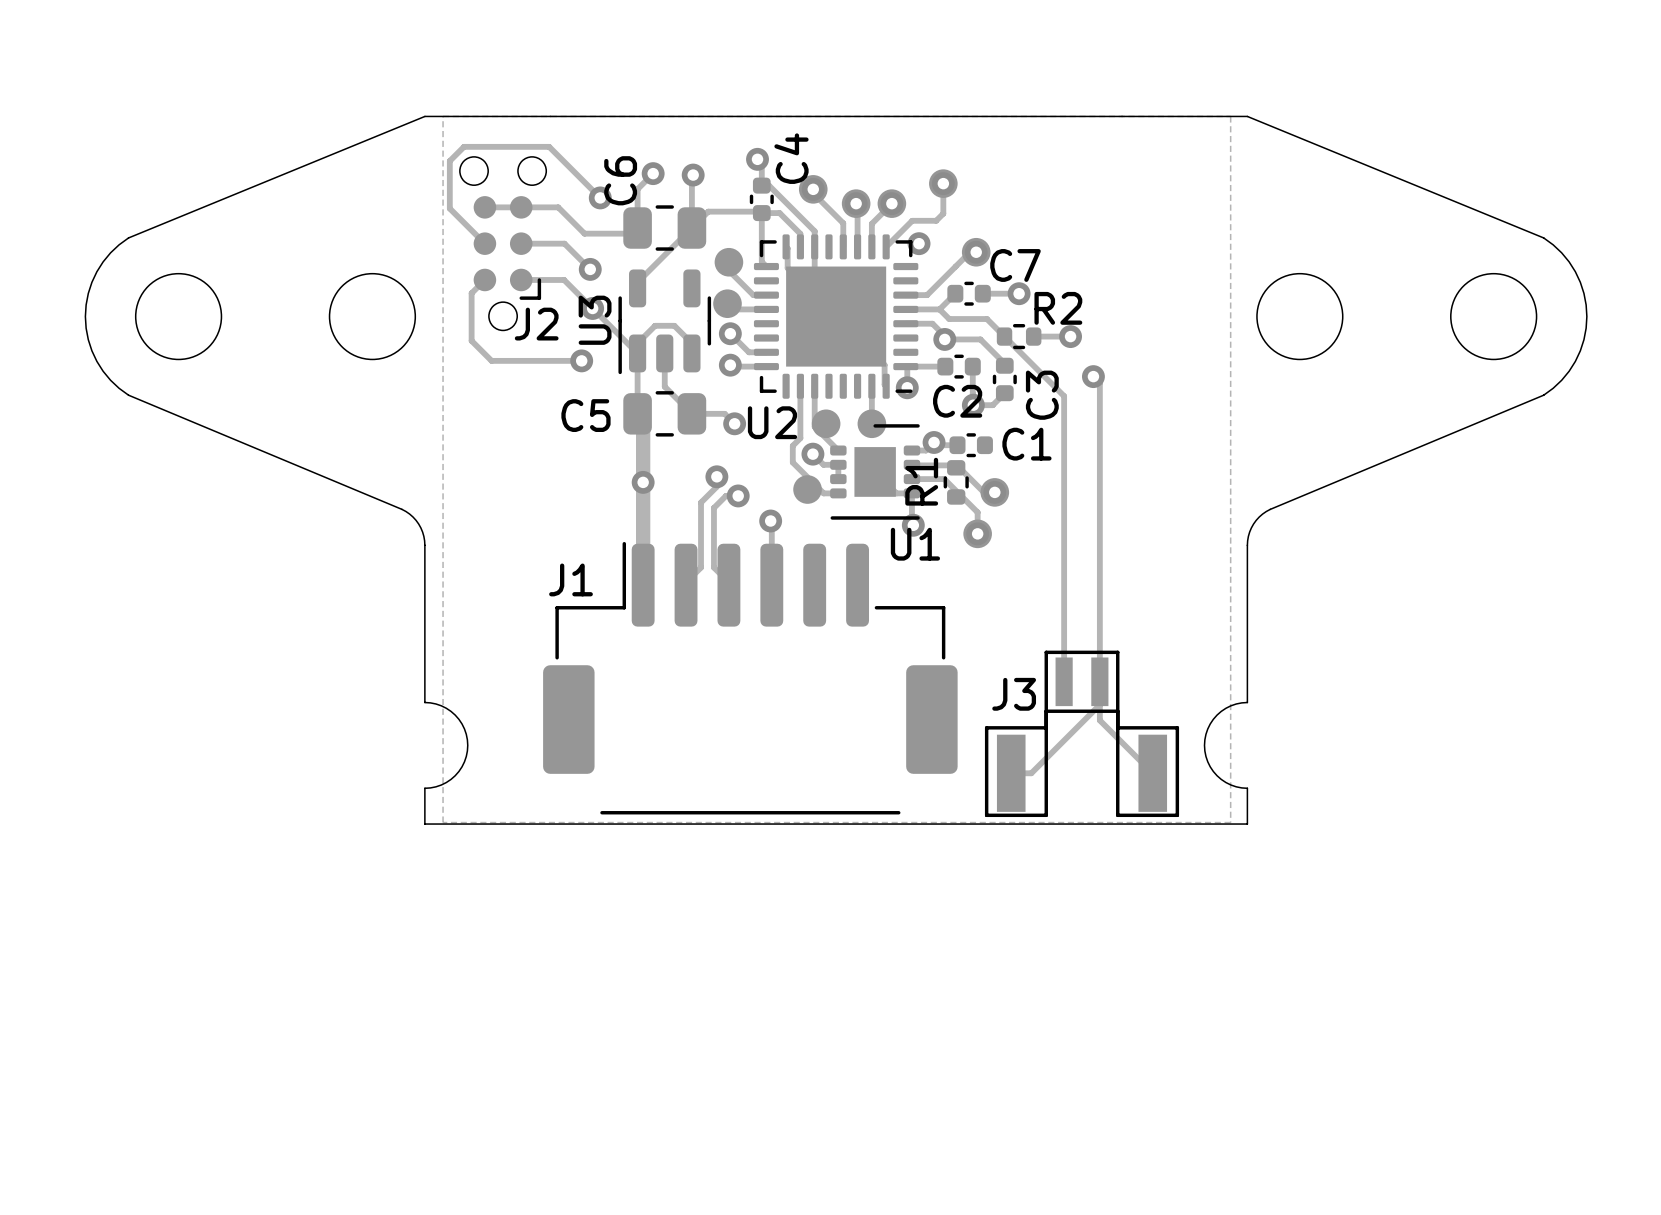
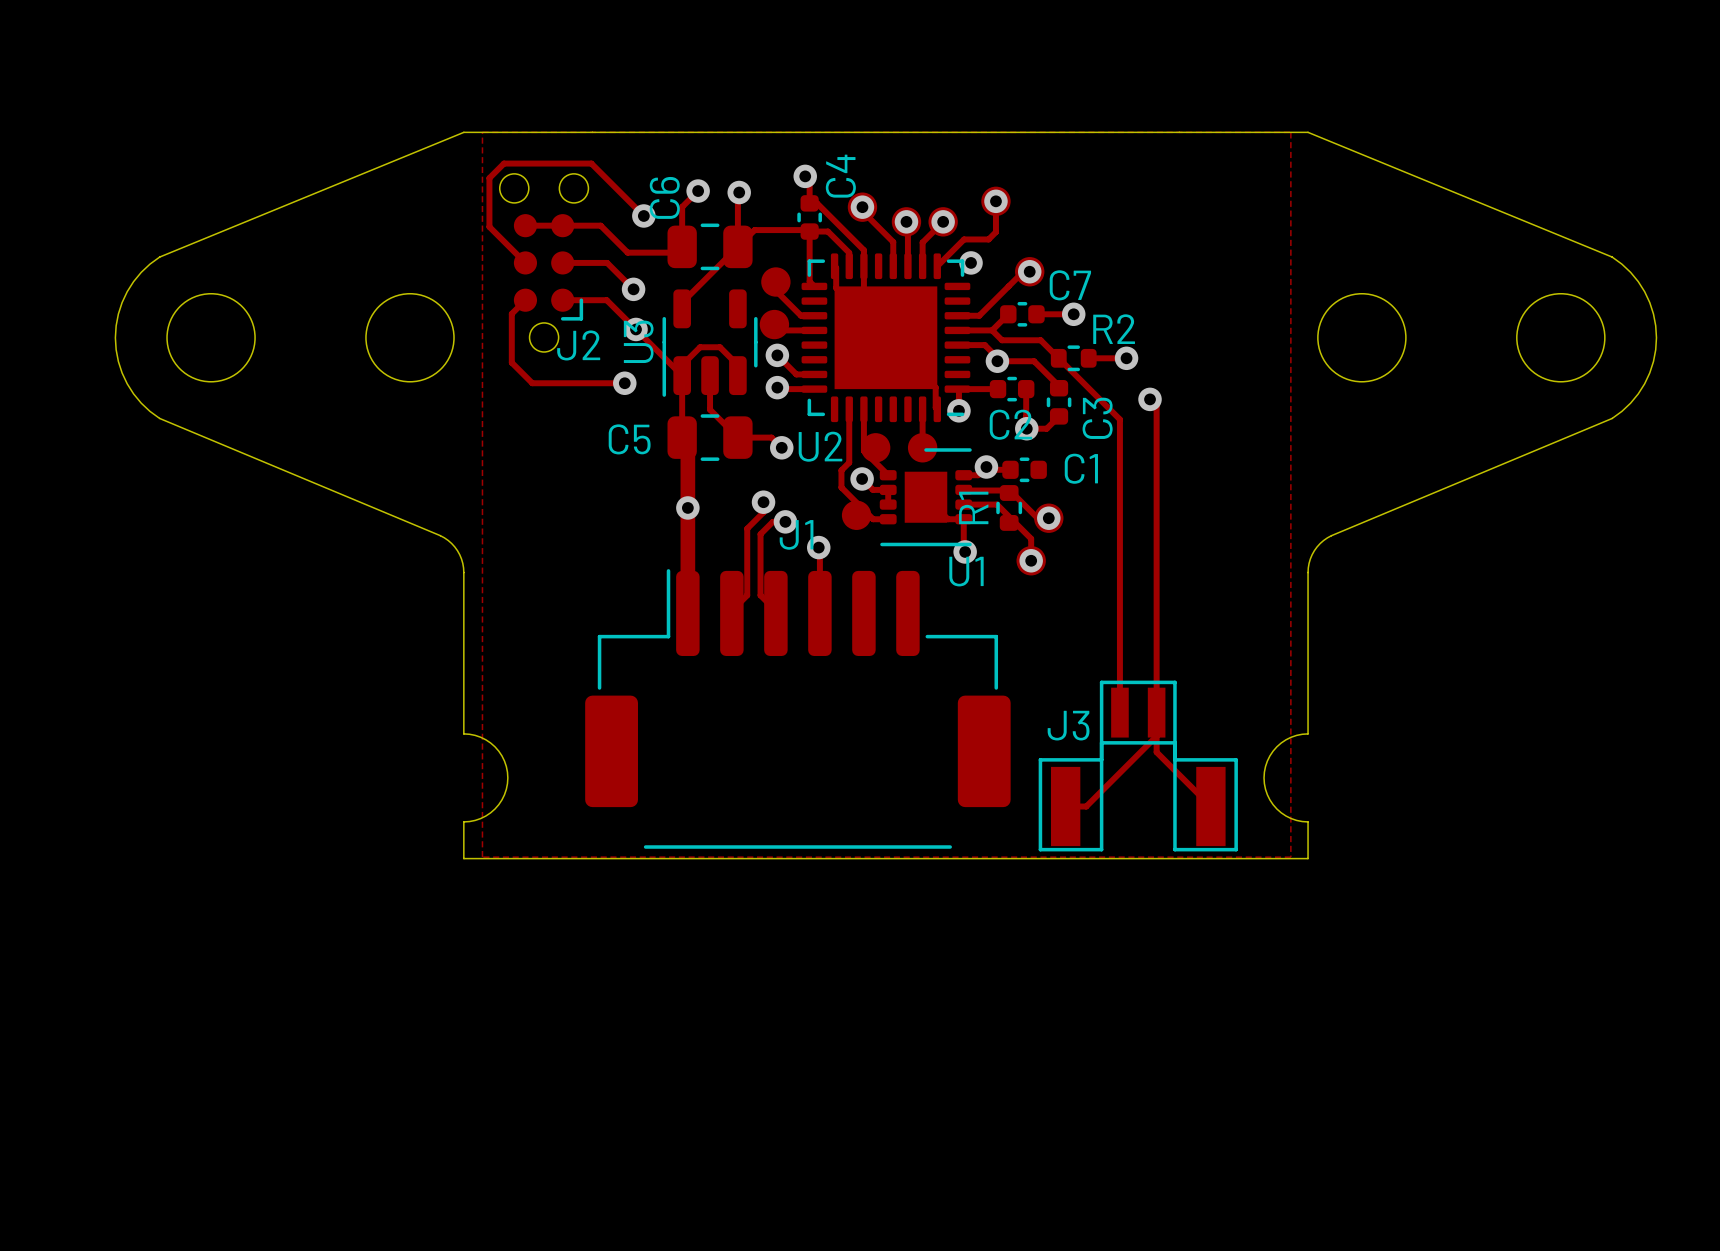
J1 name position: J1 (571, 579) -> J1 (796, 534)

